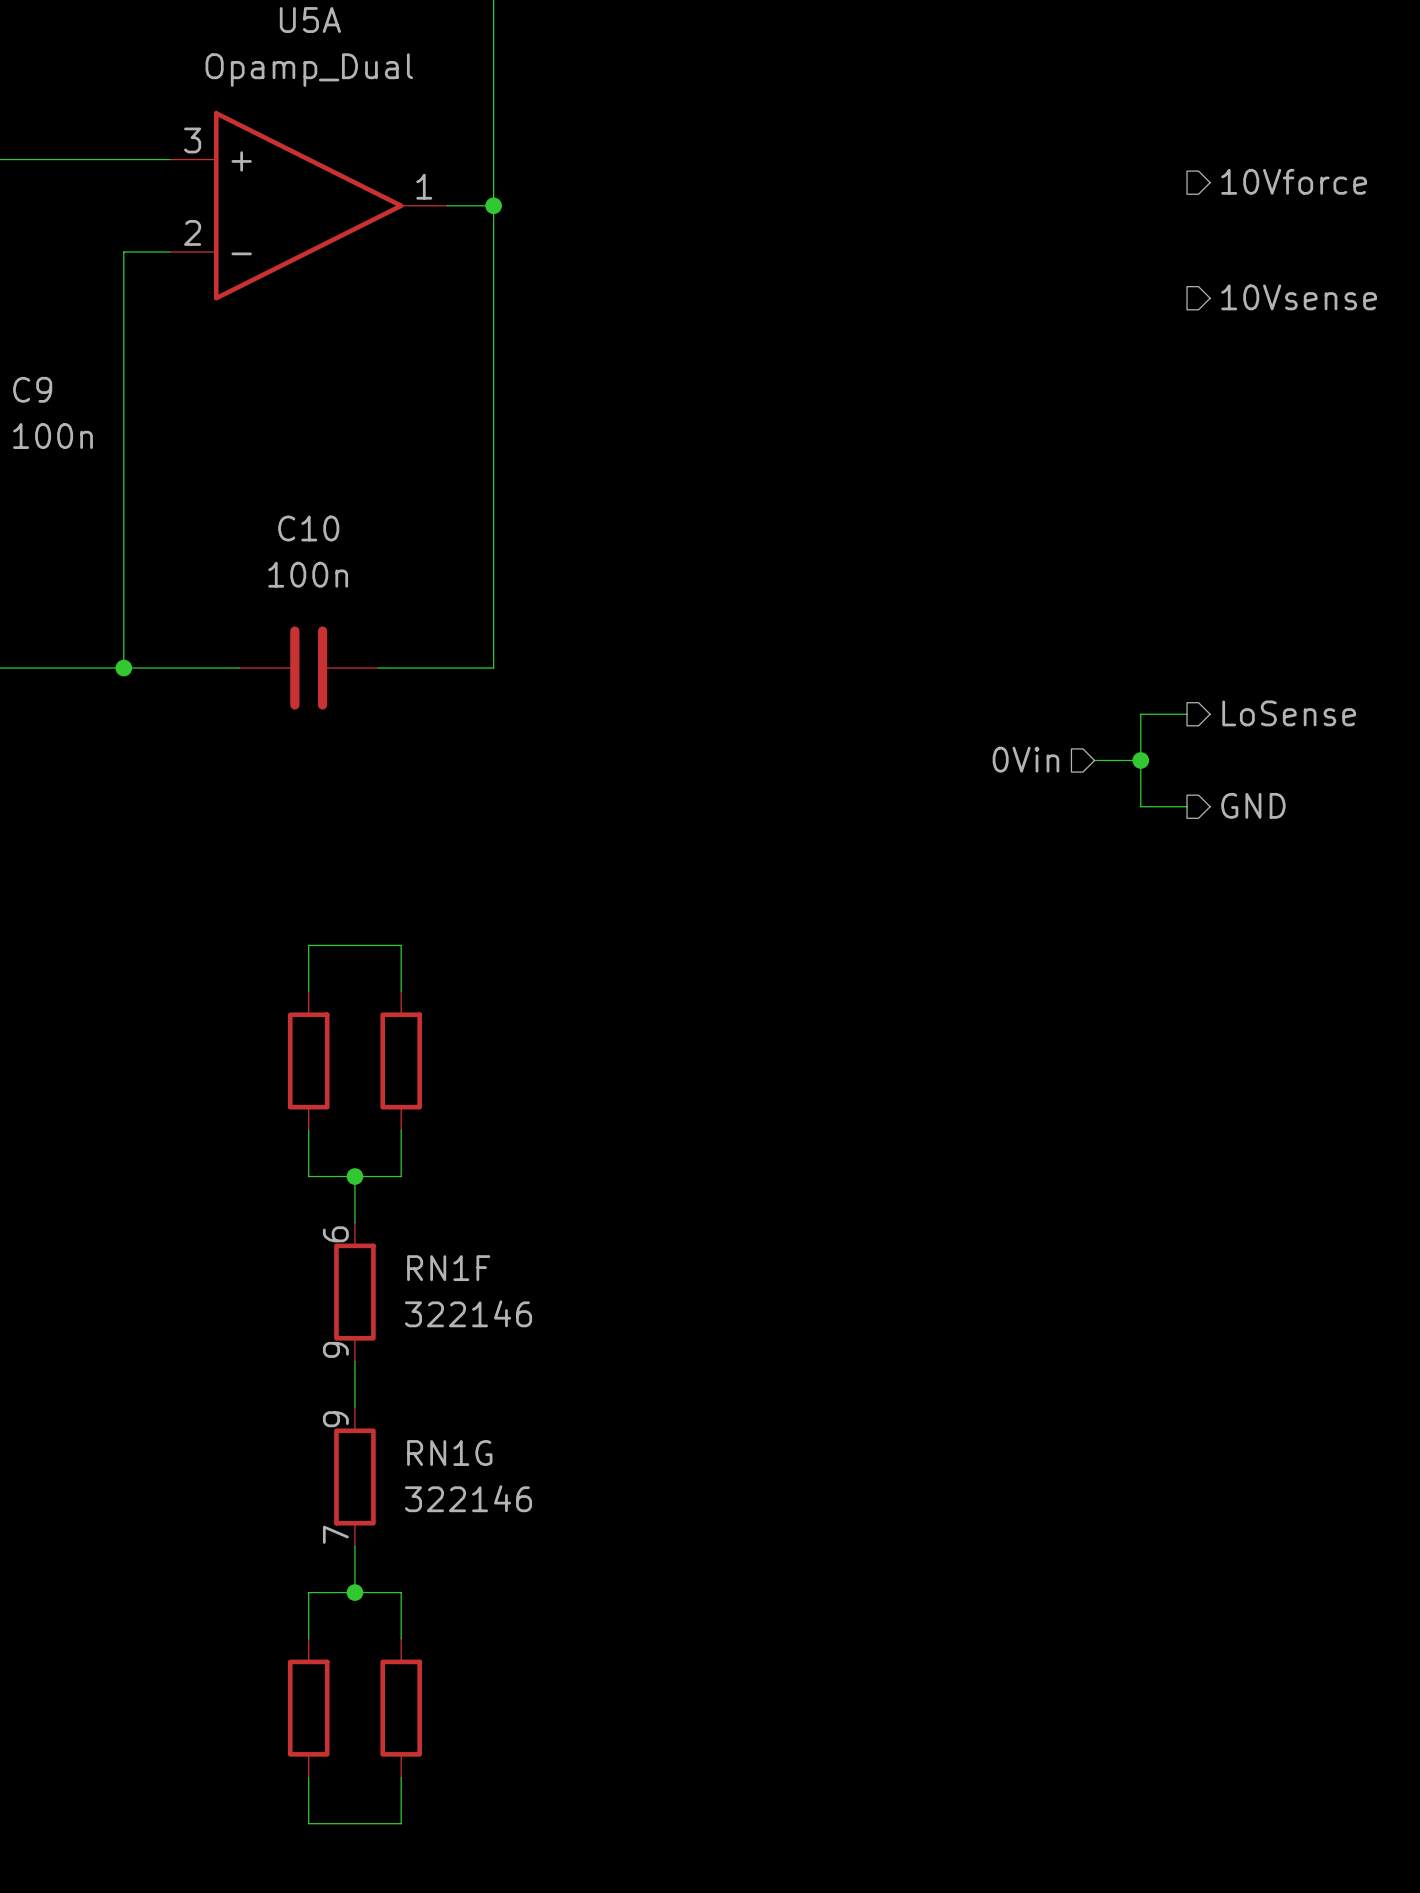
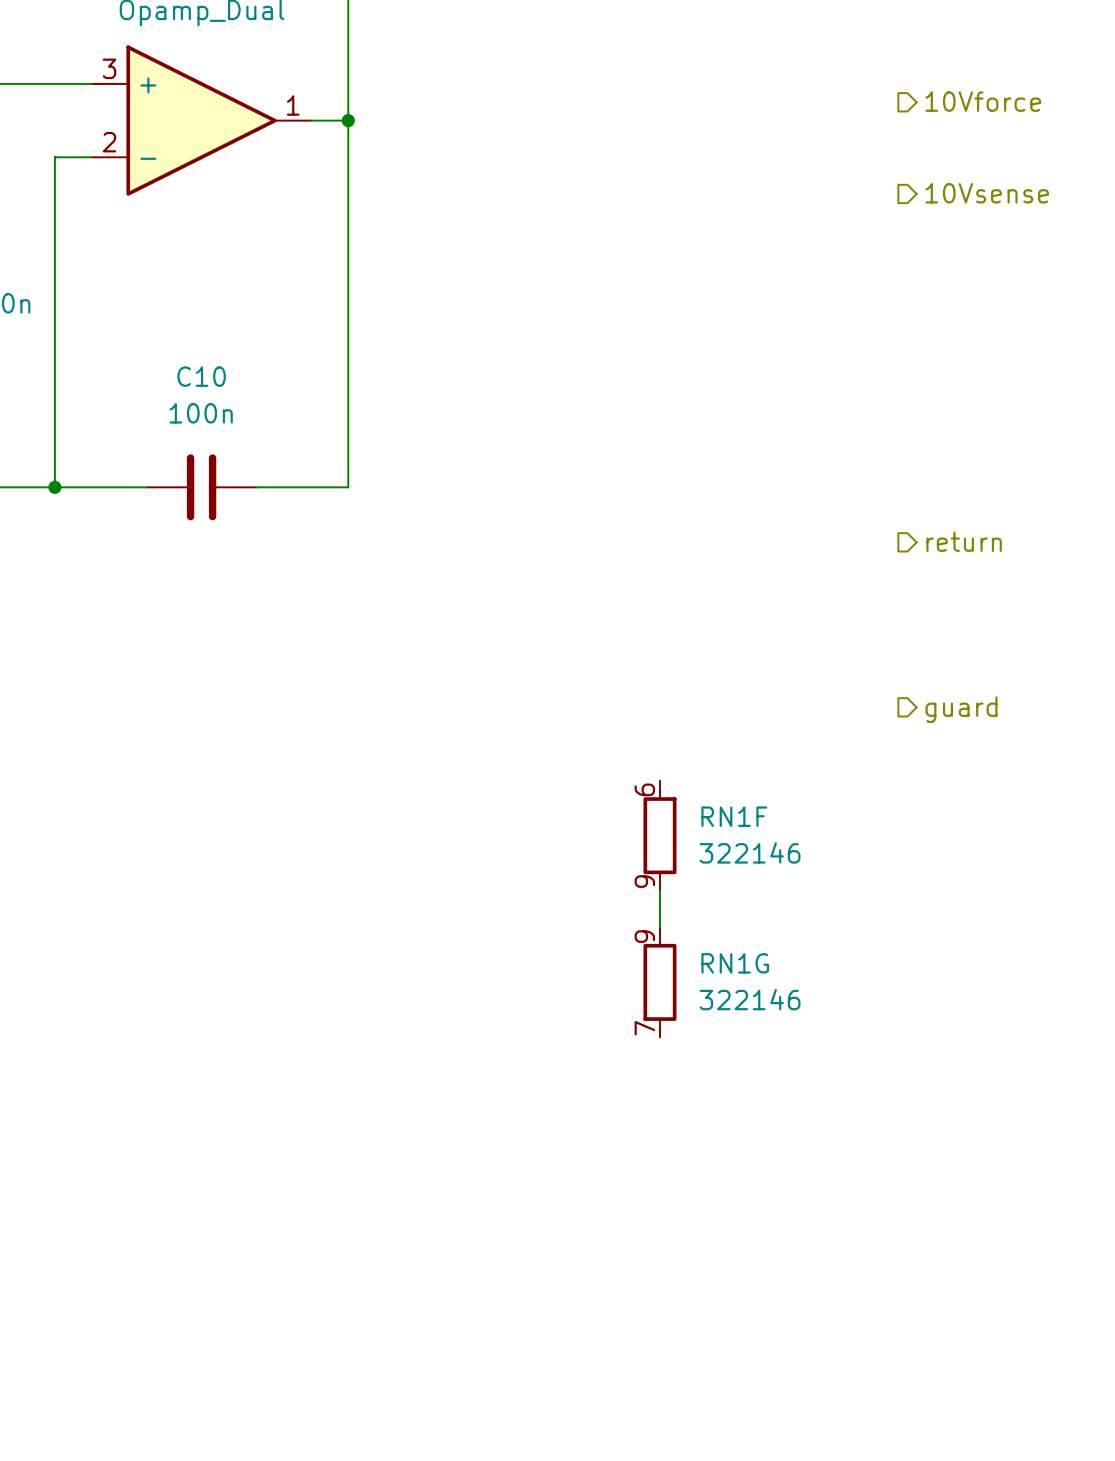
hierarchical label: LoSense (1289, 713) -> none
wire: (1187, 714) (1140, 714) (1140, 806) (1187, 806) -> none
hierarchical label: none -> return (964, 541)
hierarchical label: 0Vin (1025, 759) -> none
wire: (1094, 760) (1140, 760) -> none
junction: (1140, 760) -> none
hierarchical label: GND (1253, 805) -> none
hierarchical label: none -> guard (961, 709)
wire: (308, 991) (308, 945) (401, 945) (401, 991) -> none
part: (308, 1060) -> none
part: (401, 1060) -> none
wire: (308, 1130) (308, 1176) (401, 1176) (401, 1130) -> none
wire: (354, 1176) (354, 1222) -> none
junction: (354, 1176) -> none
wire: none -> (659, 890) (659, 927)
RN1F position: (354, 1292) -> (659, 835)
wire: (354, 1361) (354, 1407) -> none
RN1G position: (354, 1477) -> (659, 982)
wire: (354, 1546) (354, 1592) -> none
junction: (354, 1592) -> none
wire: (308, 1638) (308, 1592) (401, 1592) (401, 1638) -> none
part: (308, 1708) -> none
part: (401, 1708) -> none
wire: (308, 1777) (308, 1823) (401, 1823) (401, 1777) -> none

